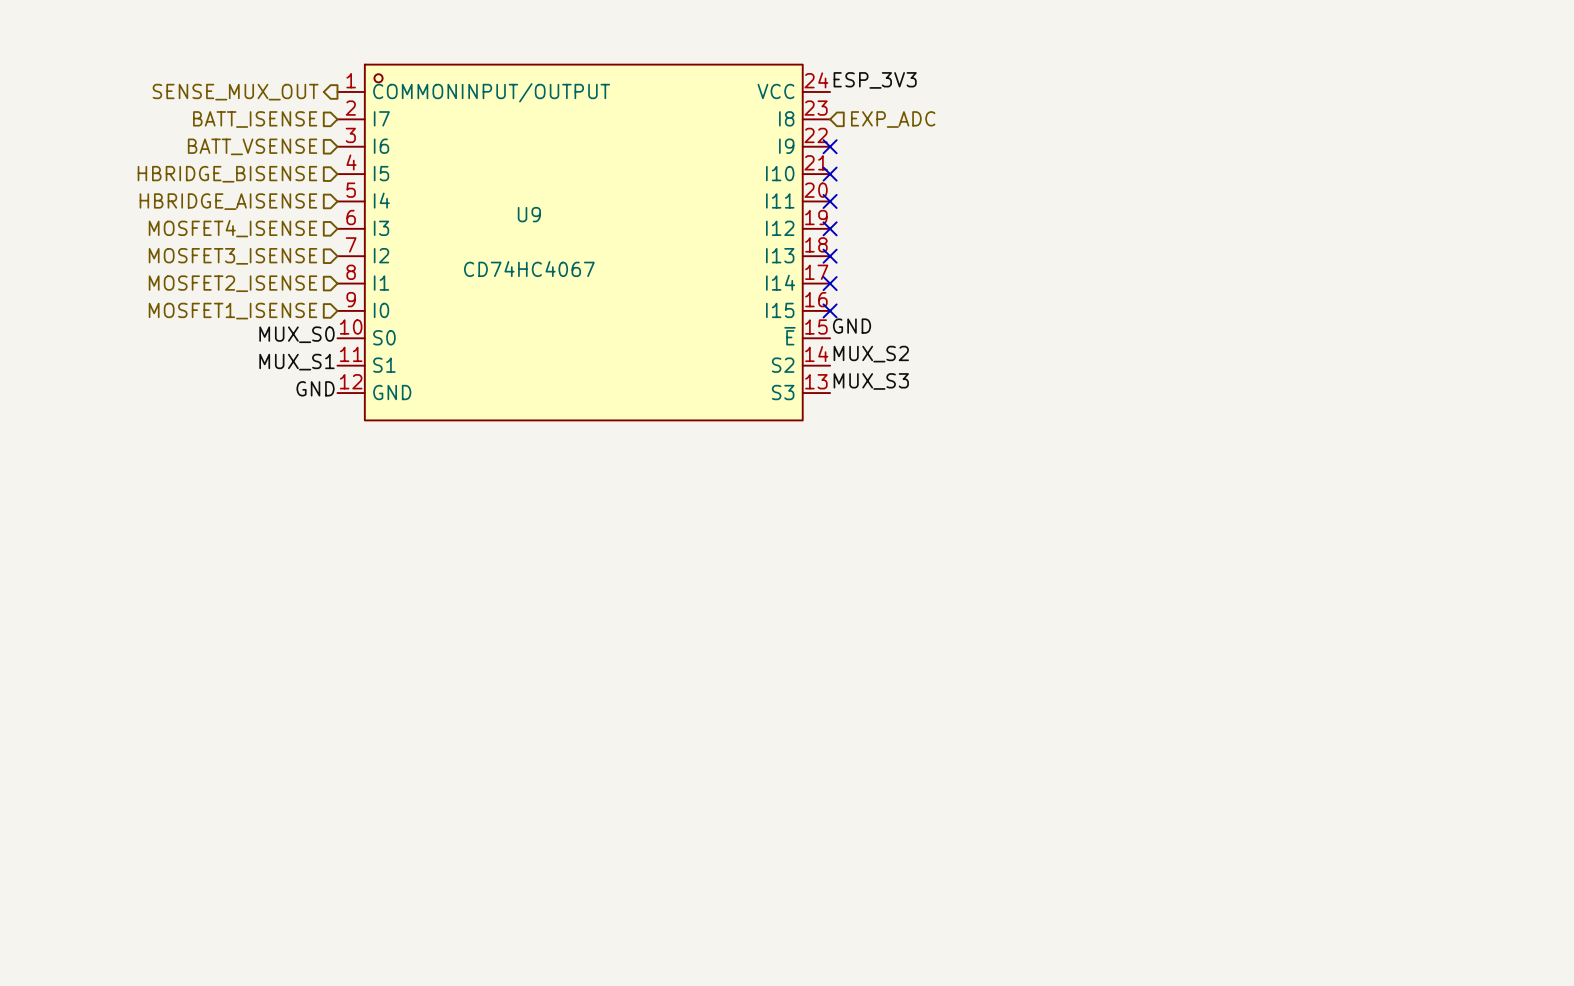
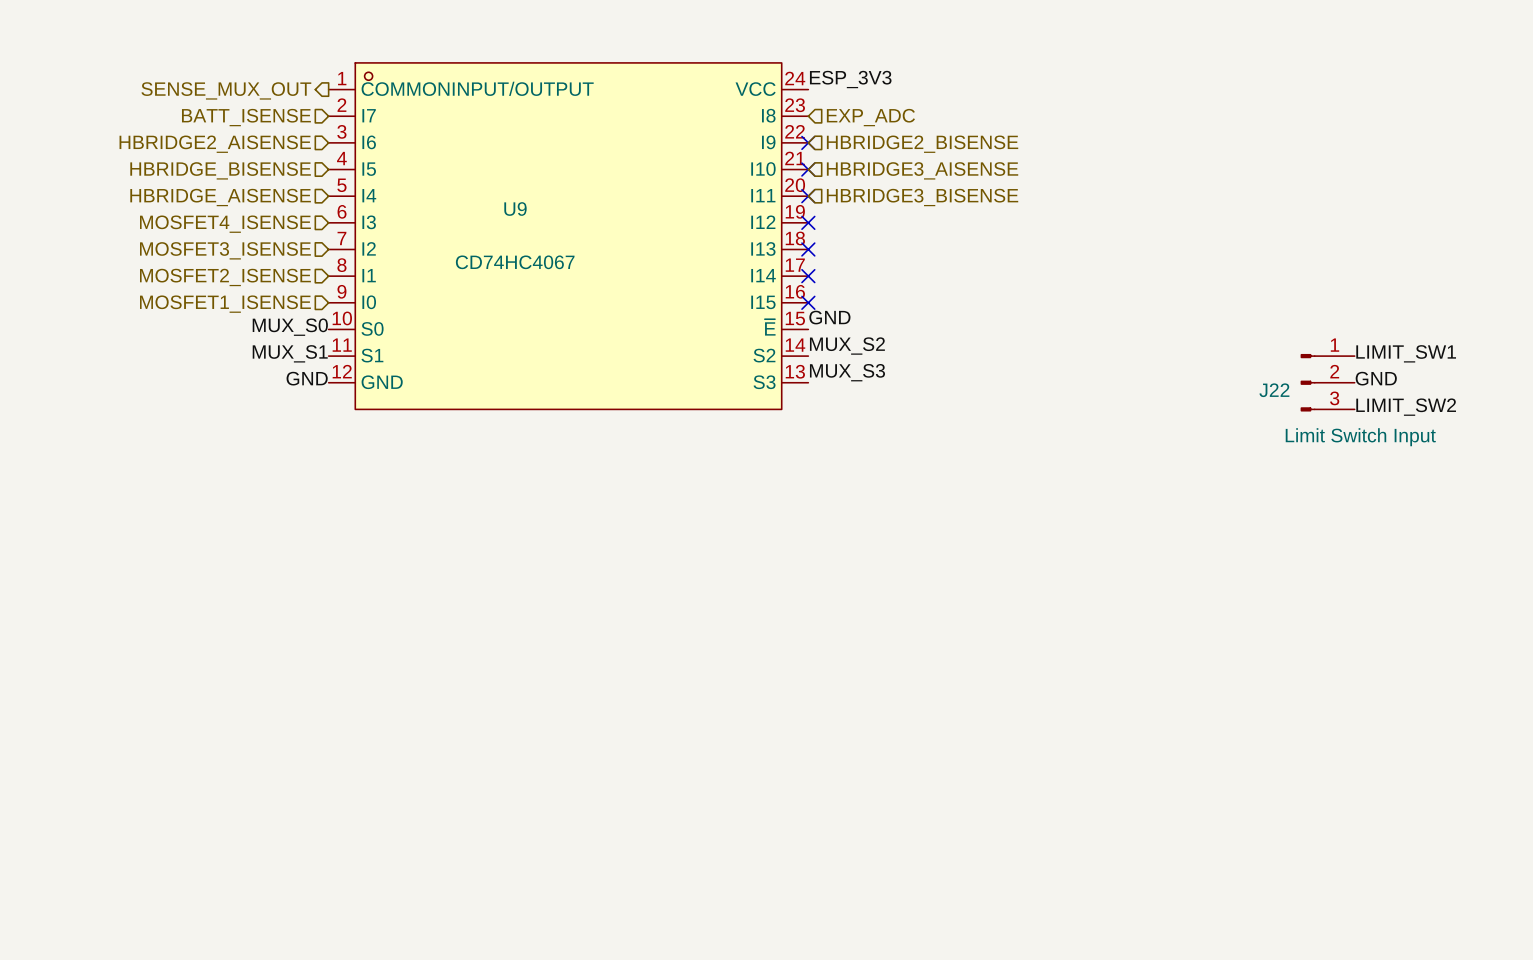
hierarchical label: BATT_VSENSE (252, 146) -> HBRIDGE2_AISENSE (215, 144)
hierarchical label: none -> HBRIDGE2_BISENSE (922, 144)
hierarchical label: none -> HBRIDGE3_AISENSE (922, 170)
hierarchical label: none -> HBRIDGE3_BISENSE (922, 197)
label: none -> LIMIT_SW1 (1406, 353)
label: none -> GND (1376, 378)
J22: none -> Limit Switch Input (1327, 382)
label: none -> LIMIT_SW2 (1406, 407)

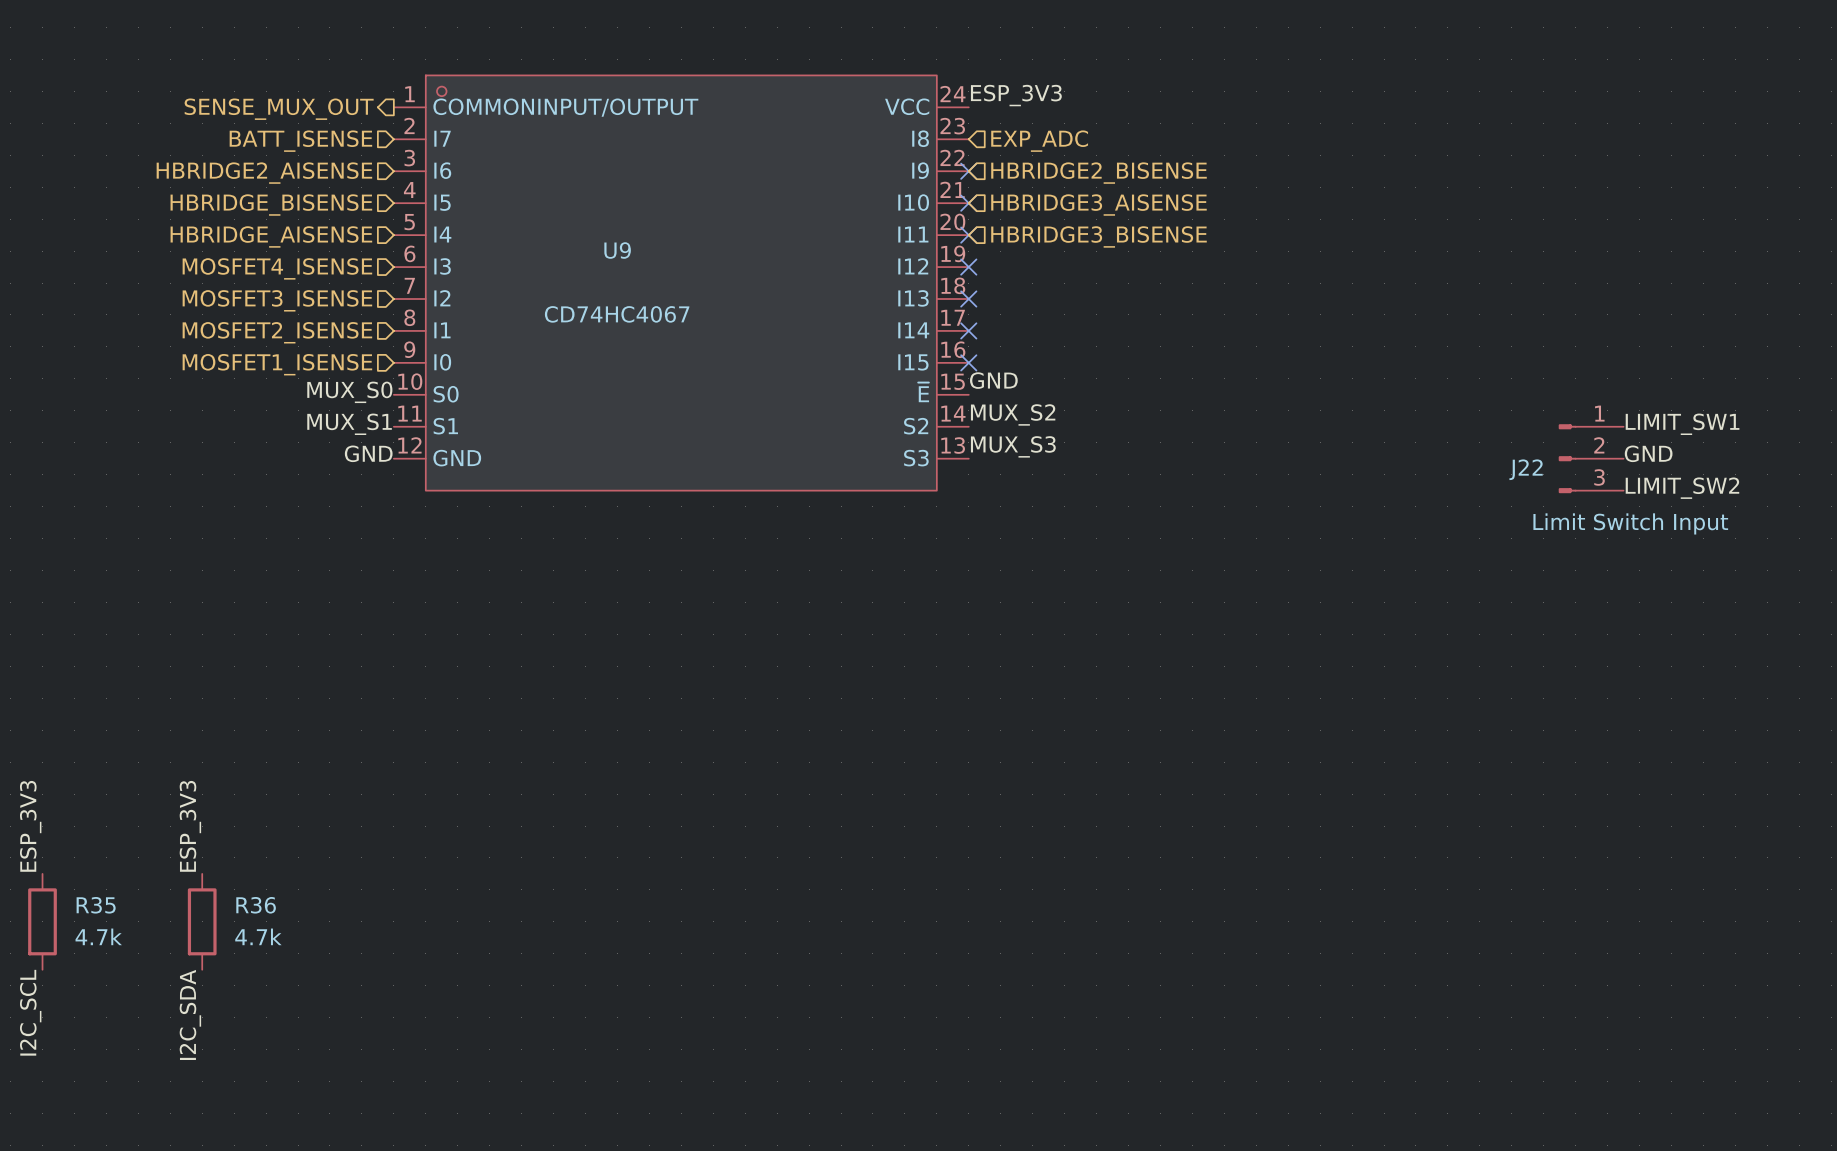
label: none -> ESP_3V3 (30, 826)
label: none -> ESP_3V3 (190, 826)
R35: none -> 4.7k (42, 921)
R36: none -> 4.7k (202, 921)
label: none -> I2C_SCL (30, 1012)
label: none -> I2C_SDA (190, 1014)

